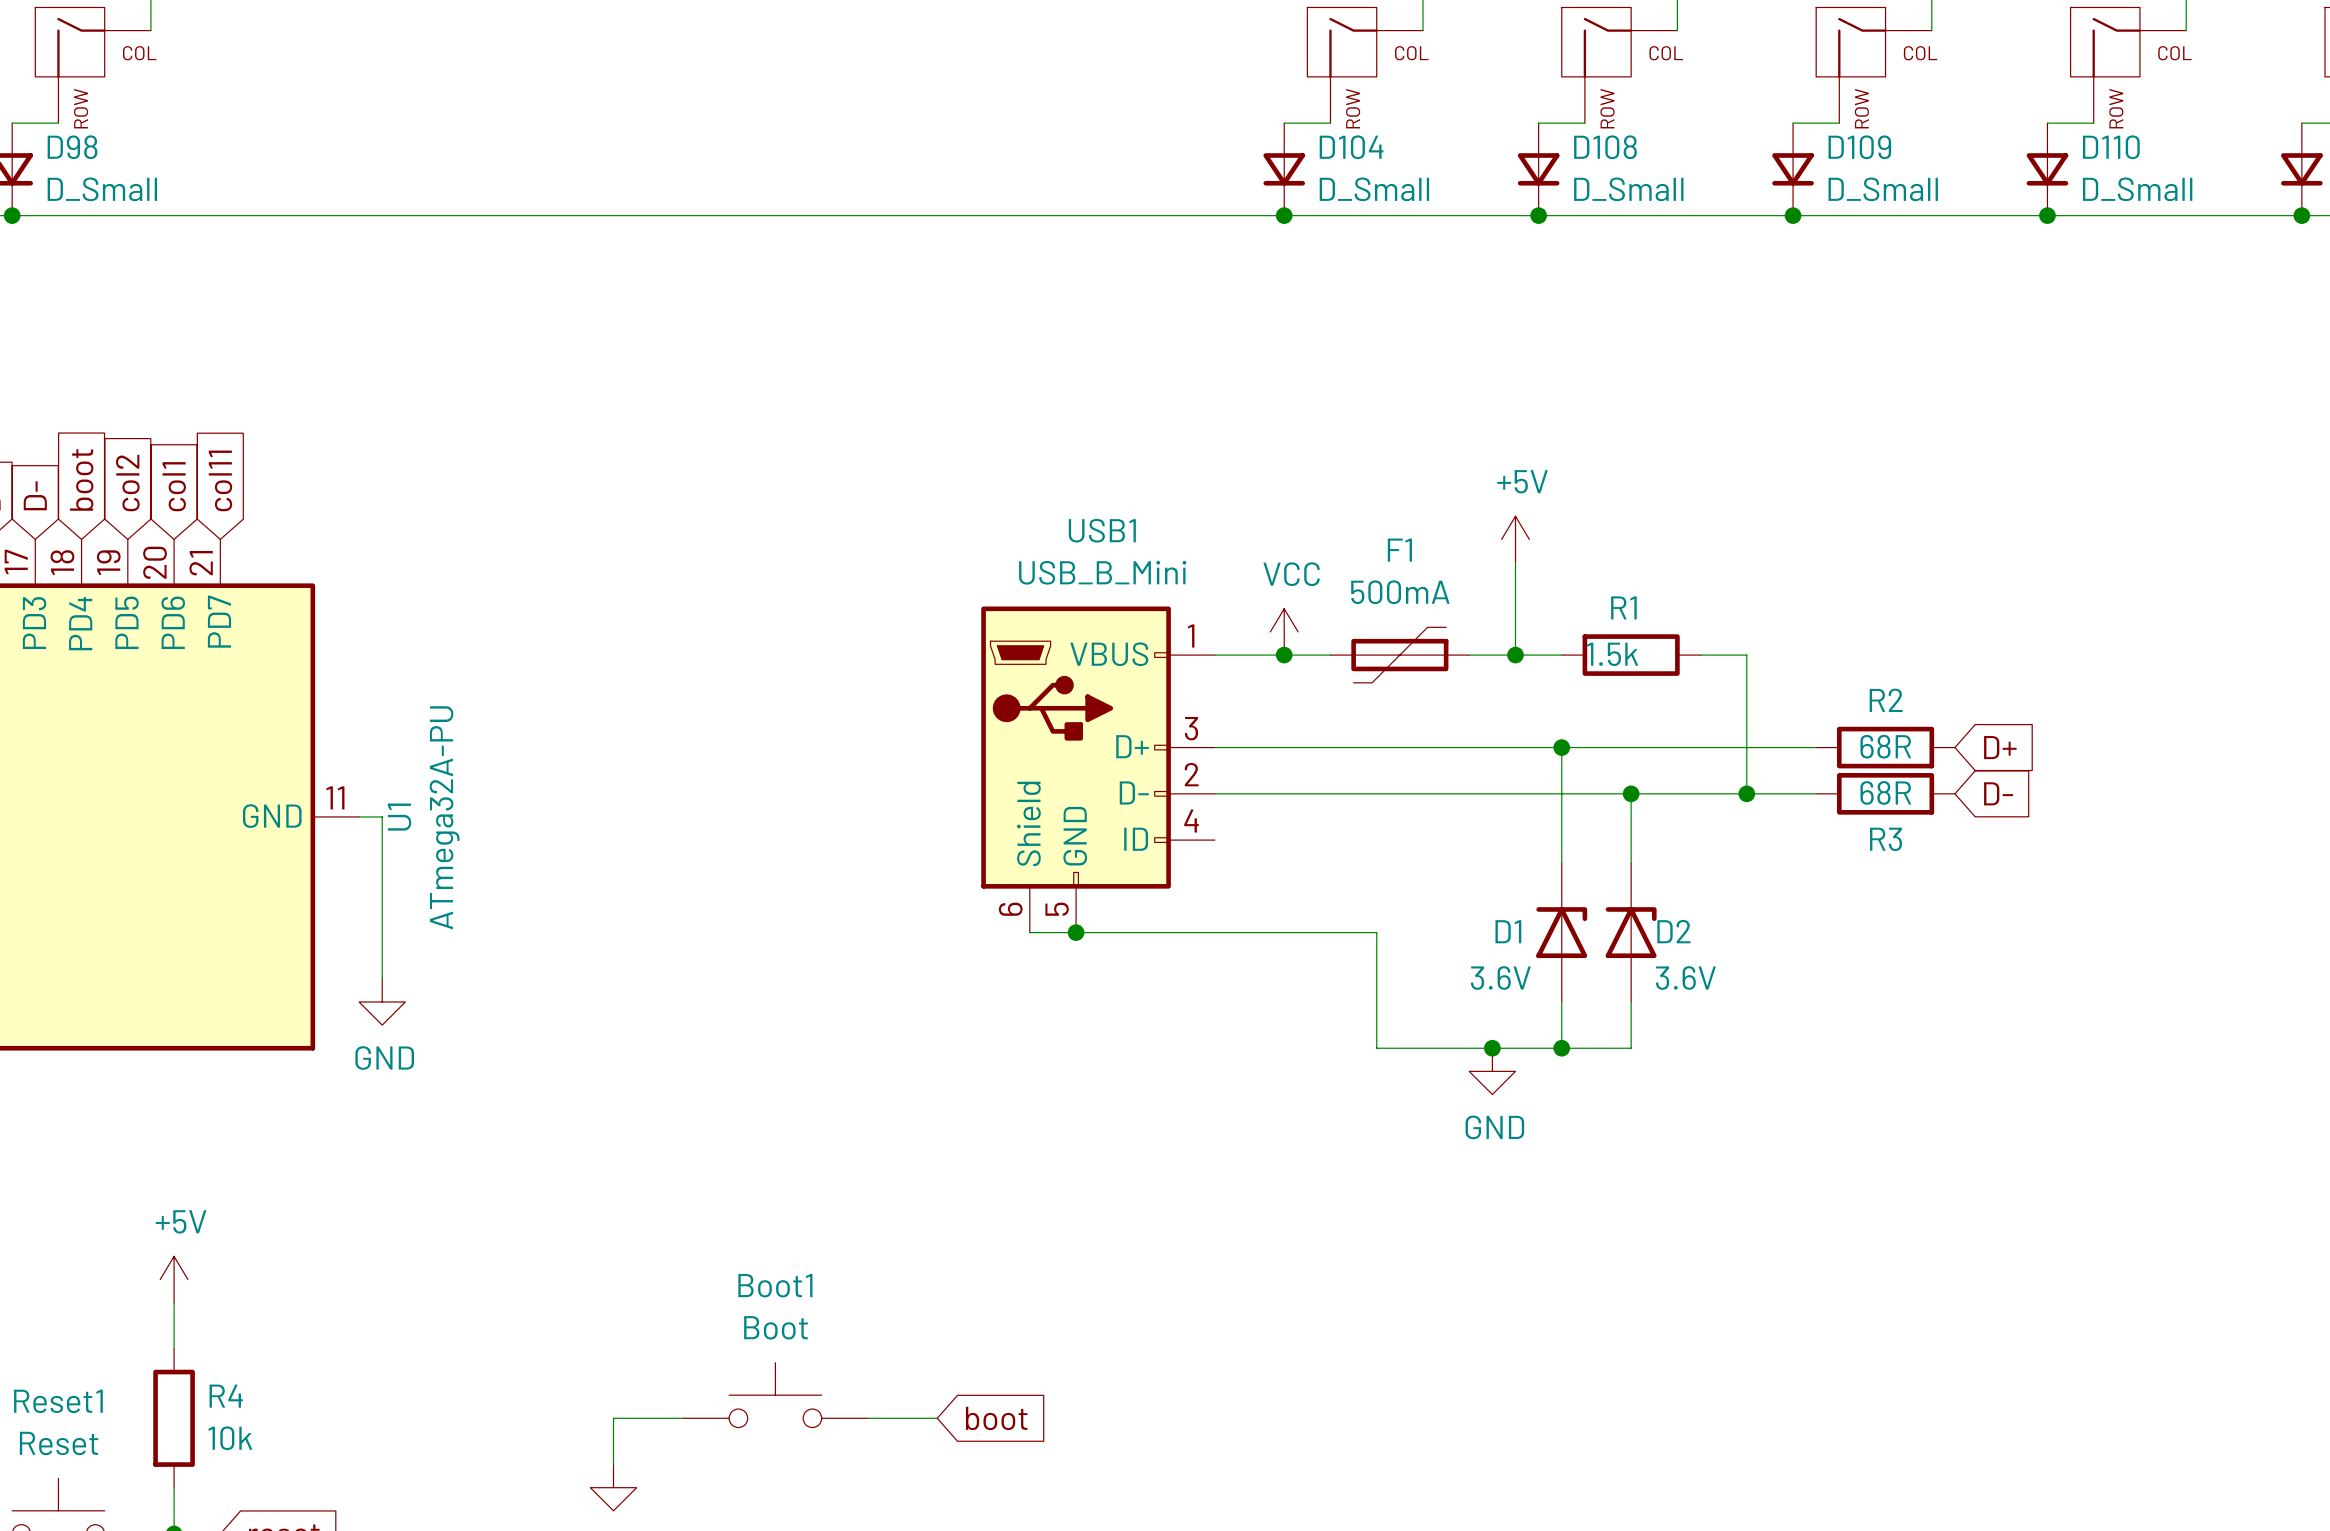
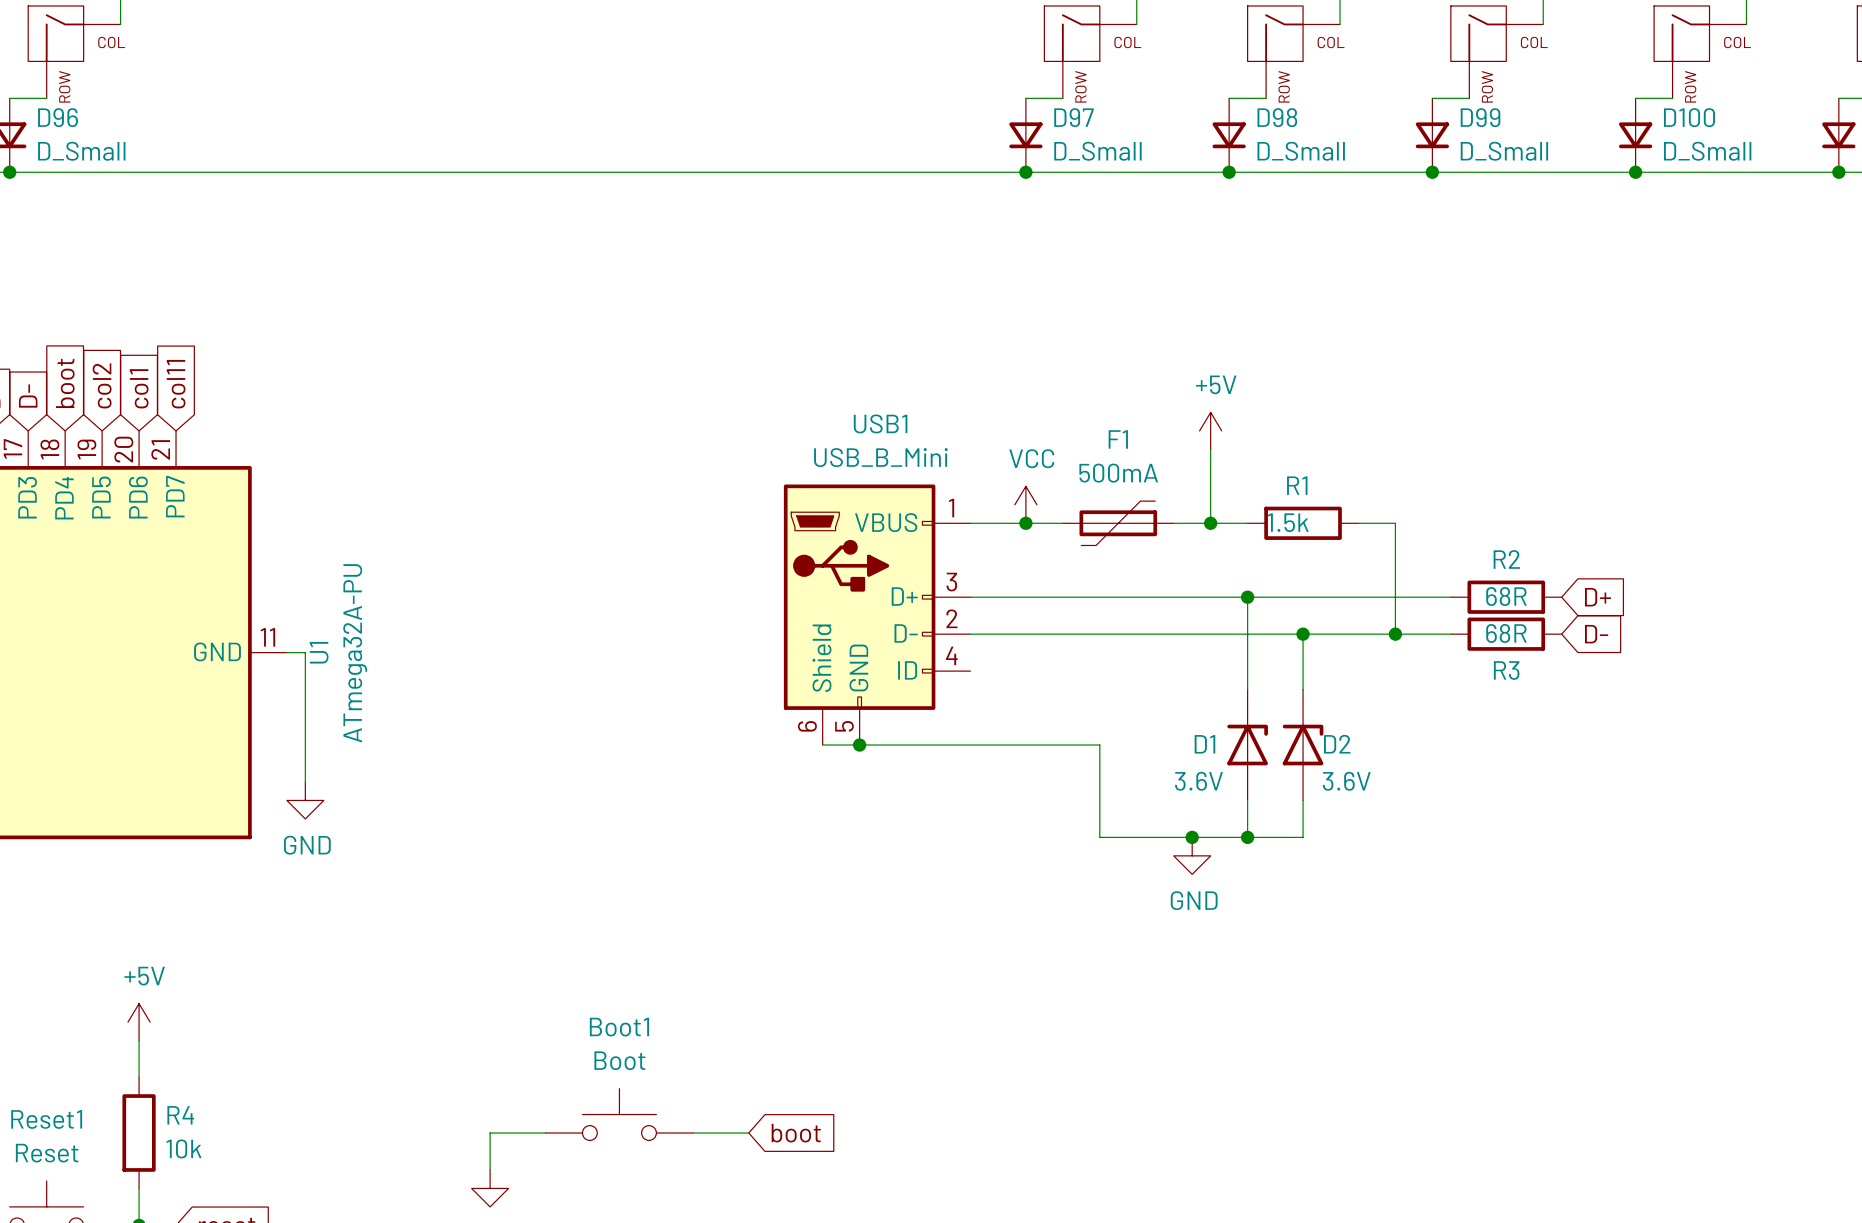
D98 name: D98 (72, 147) -> D96 (58, 117)
D104 name: D104 (1351, 147) -> D97 (1073, 117)
D108 name: D108 (1605, 147) -> D98 (1277, 117)
D109 name: D109 (1859, 147) -> D99 (1480, 117)
D110 name: D110 (2111, 147) -> D100 (1689, 117)

